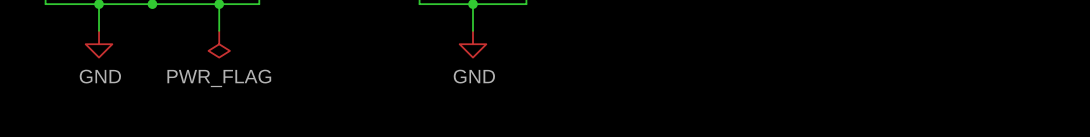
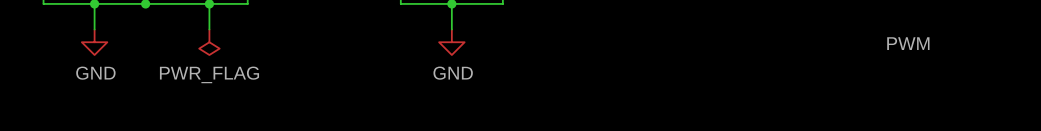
label: none -> PWM (908, 43)

